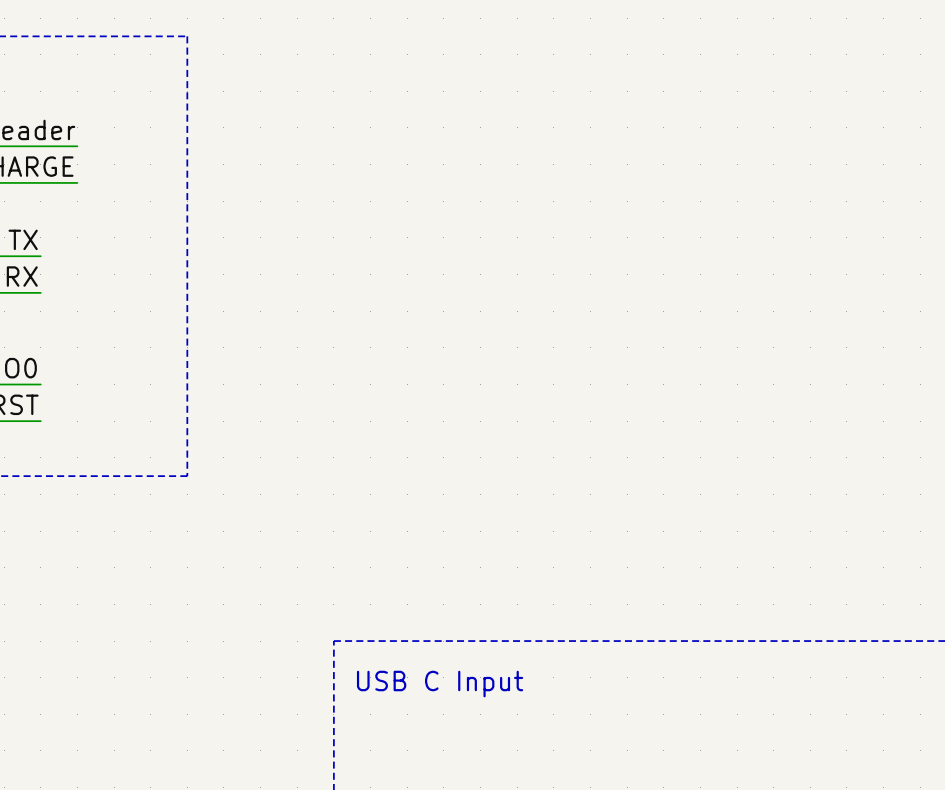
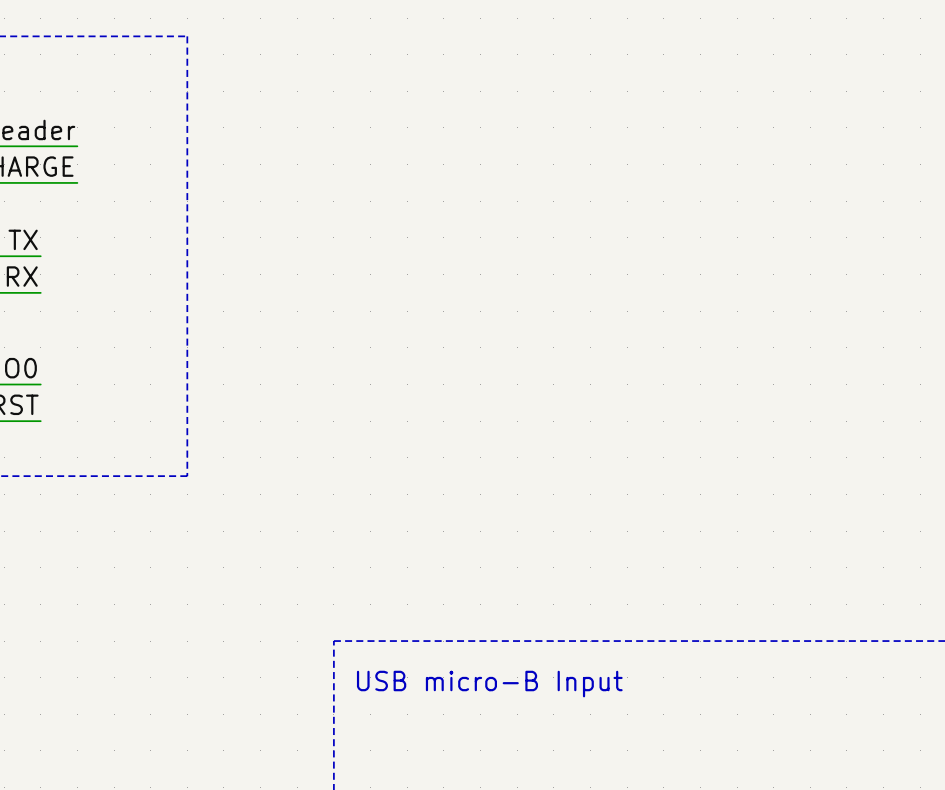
text: USB C Input (440, 684) -> USB micro-B Input (489, 684)

